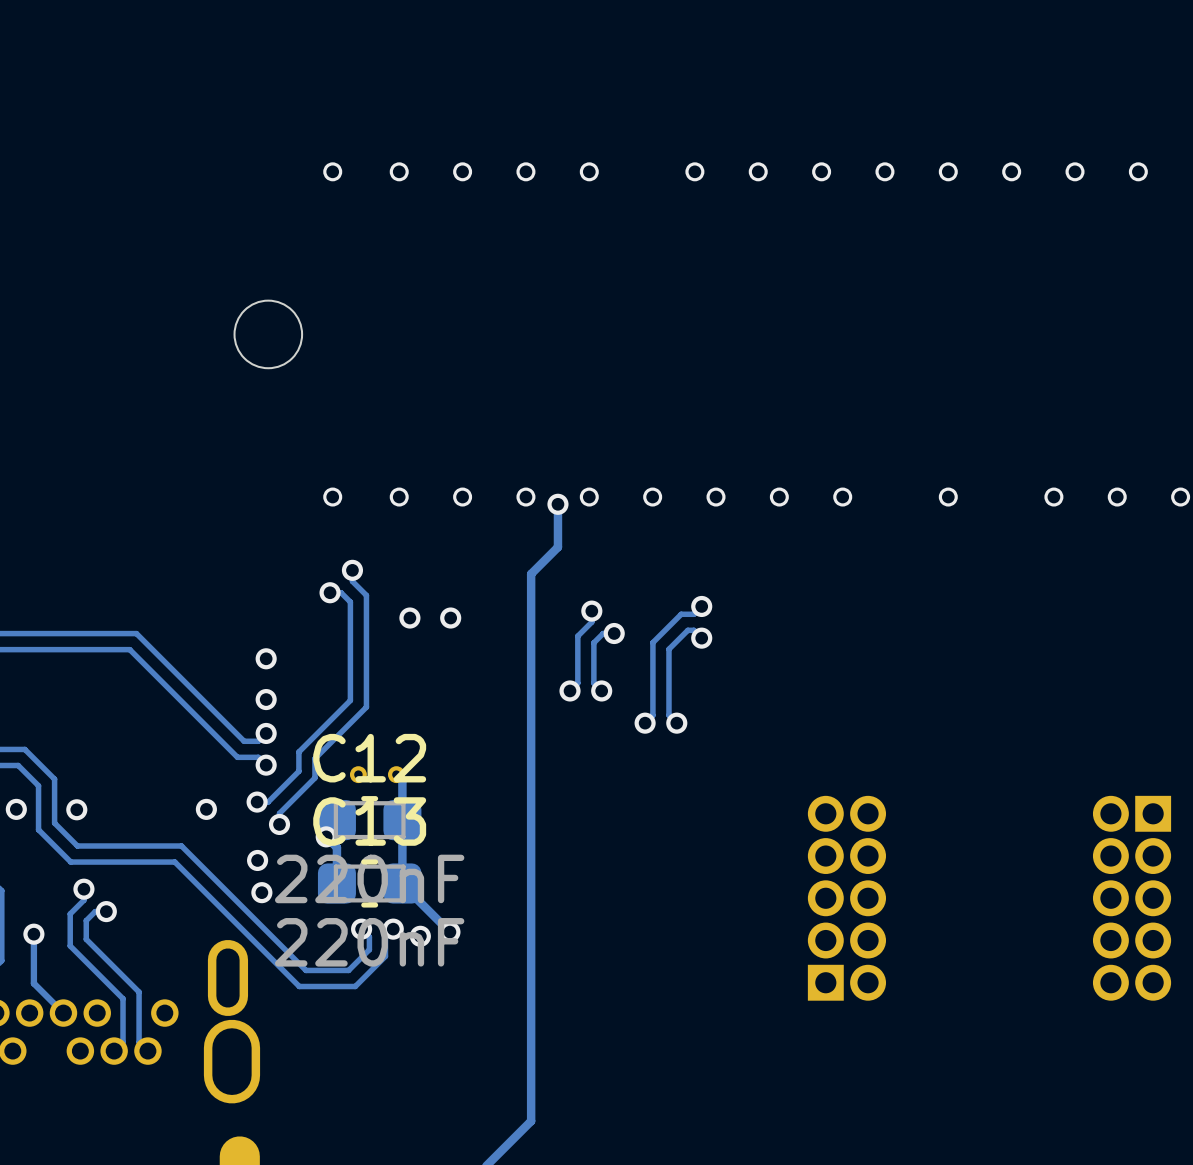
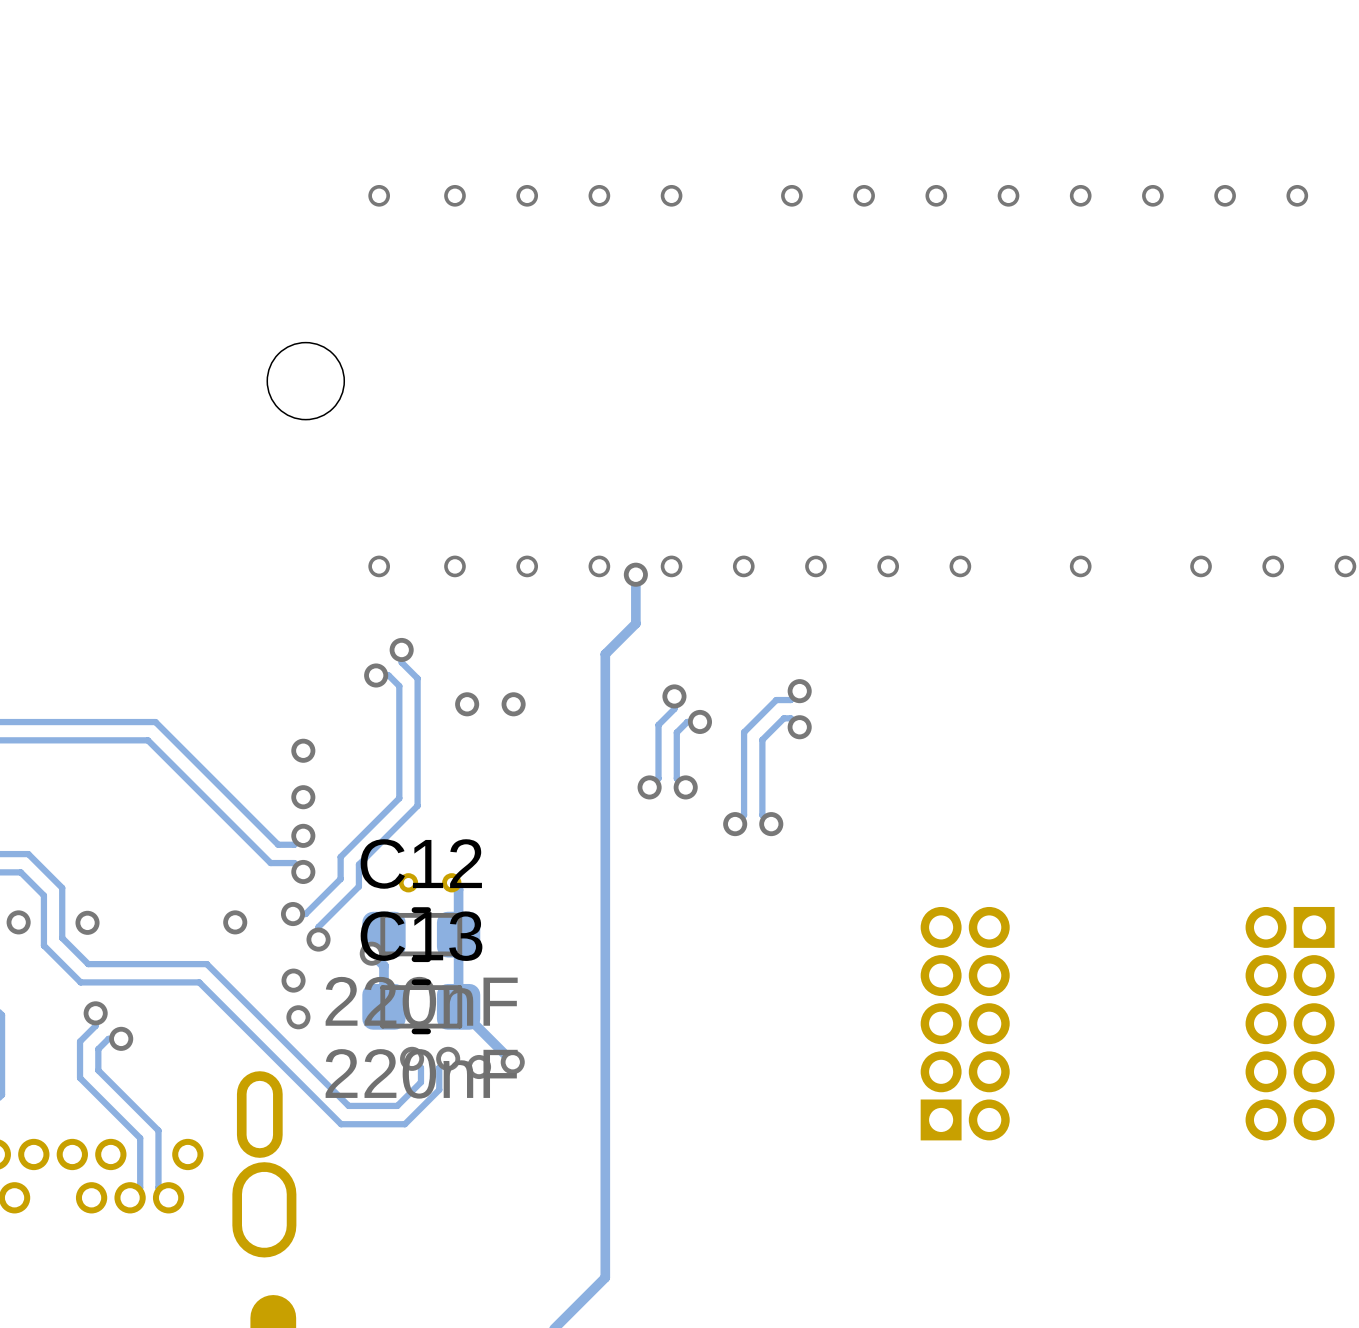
track: (33, 934) (33, 983) (63, 1013) -> none
via: (33, 934) -> none

